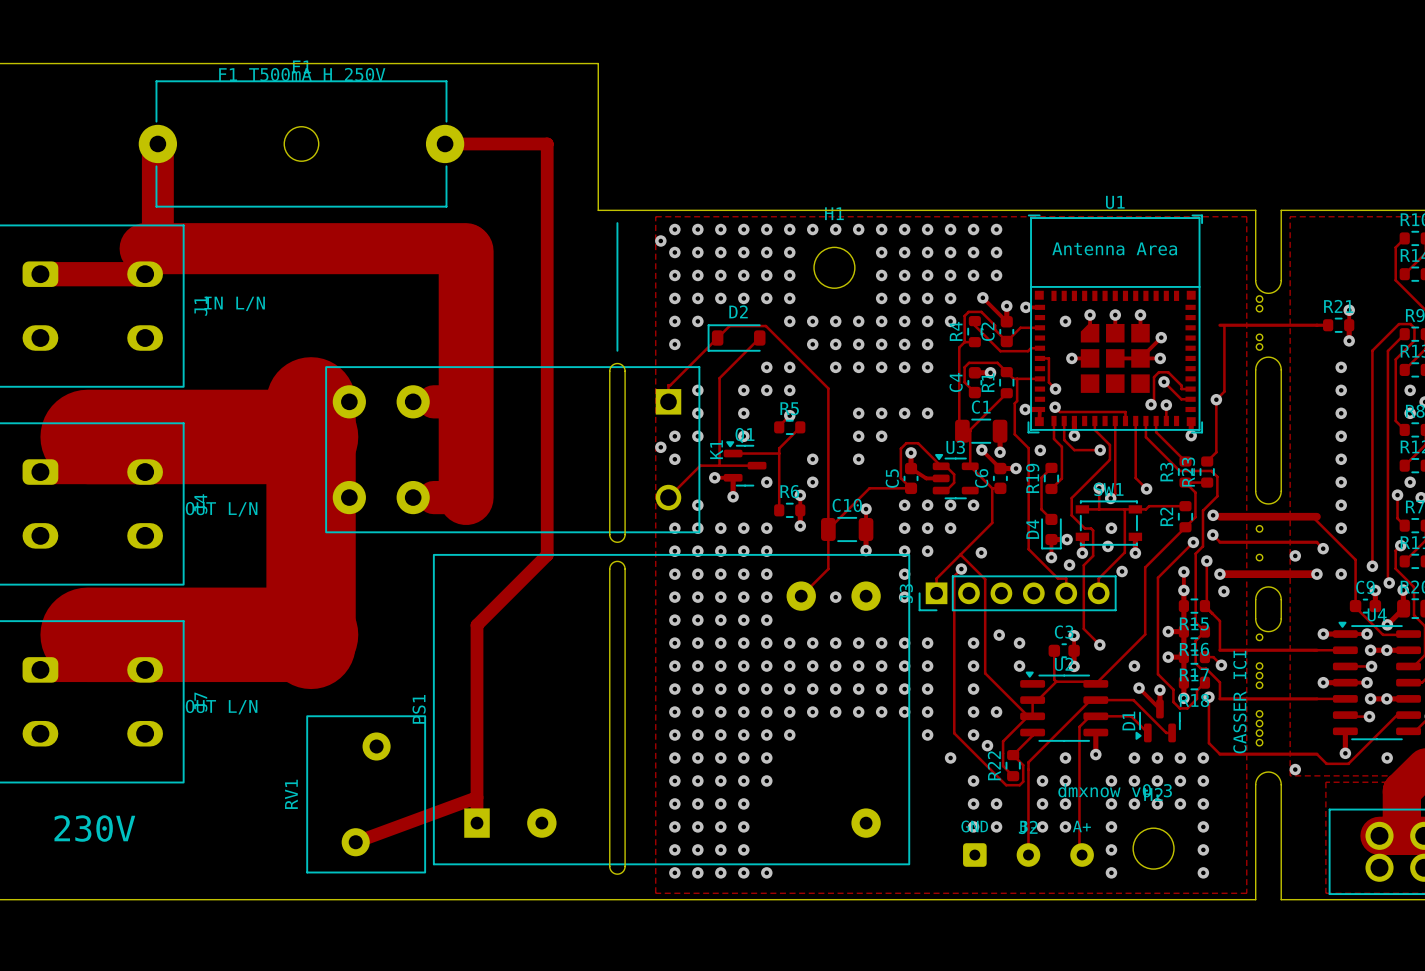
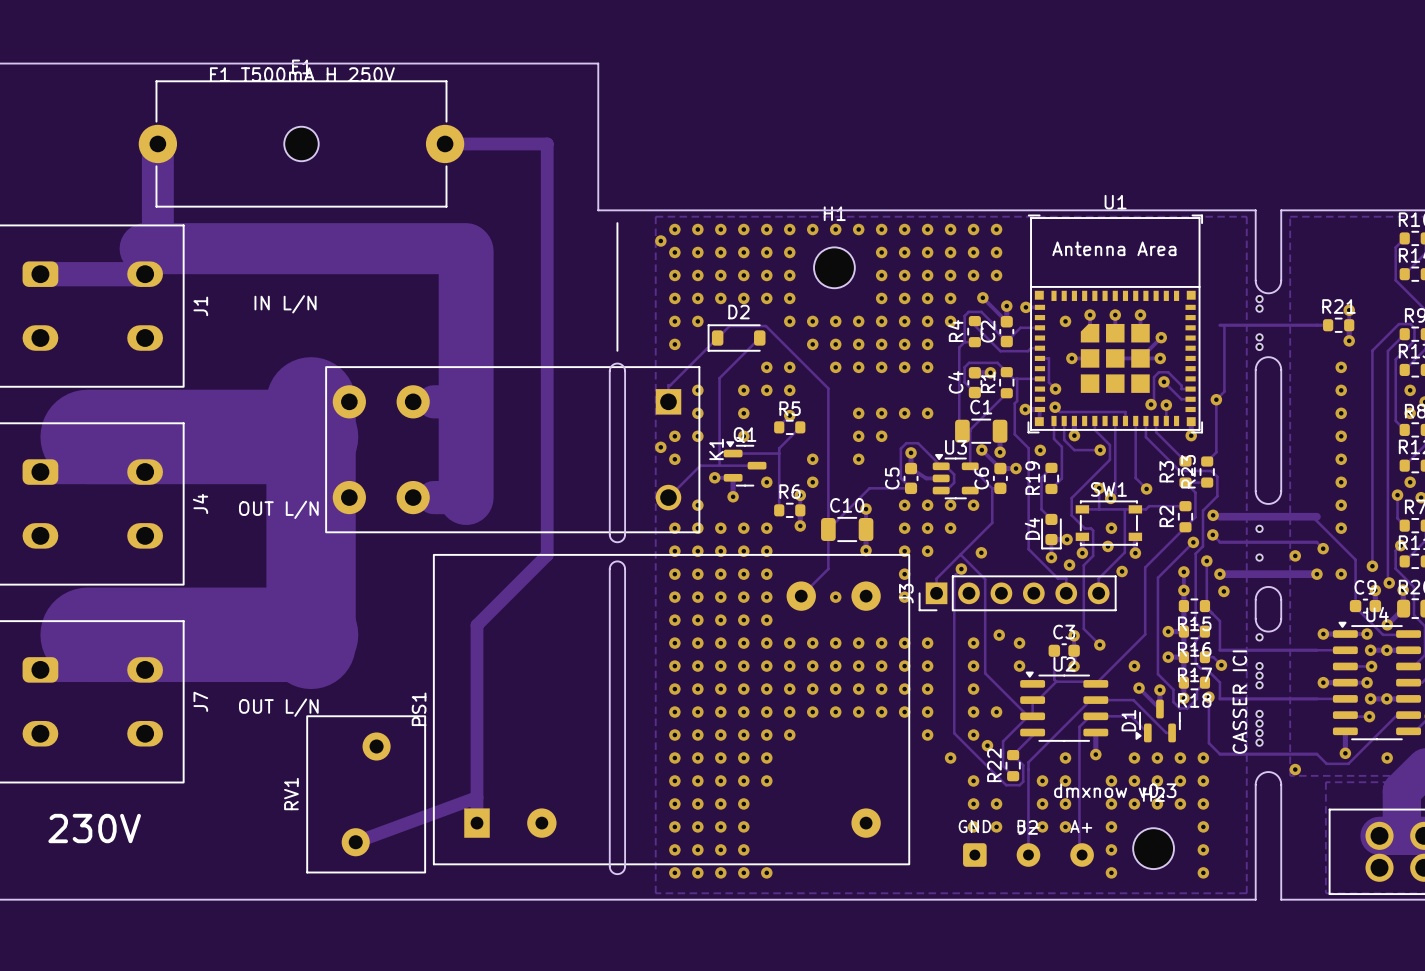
text position: IN L/N (234, 303) -> IN L/N (285, 304)
text position: OUT L/N (221, 509) -> OUT L/N (278, 509)
text position: OUT L/N (221, 707) -> OUT L/N (278, 707)

